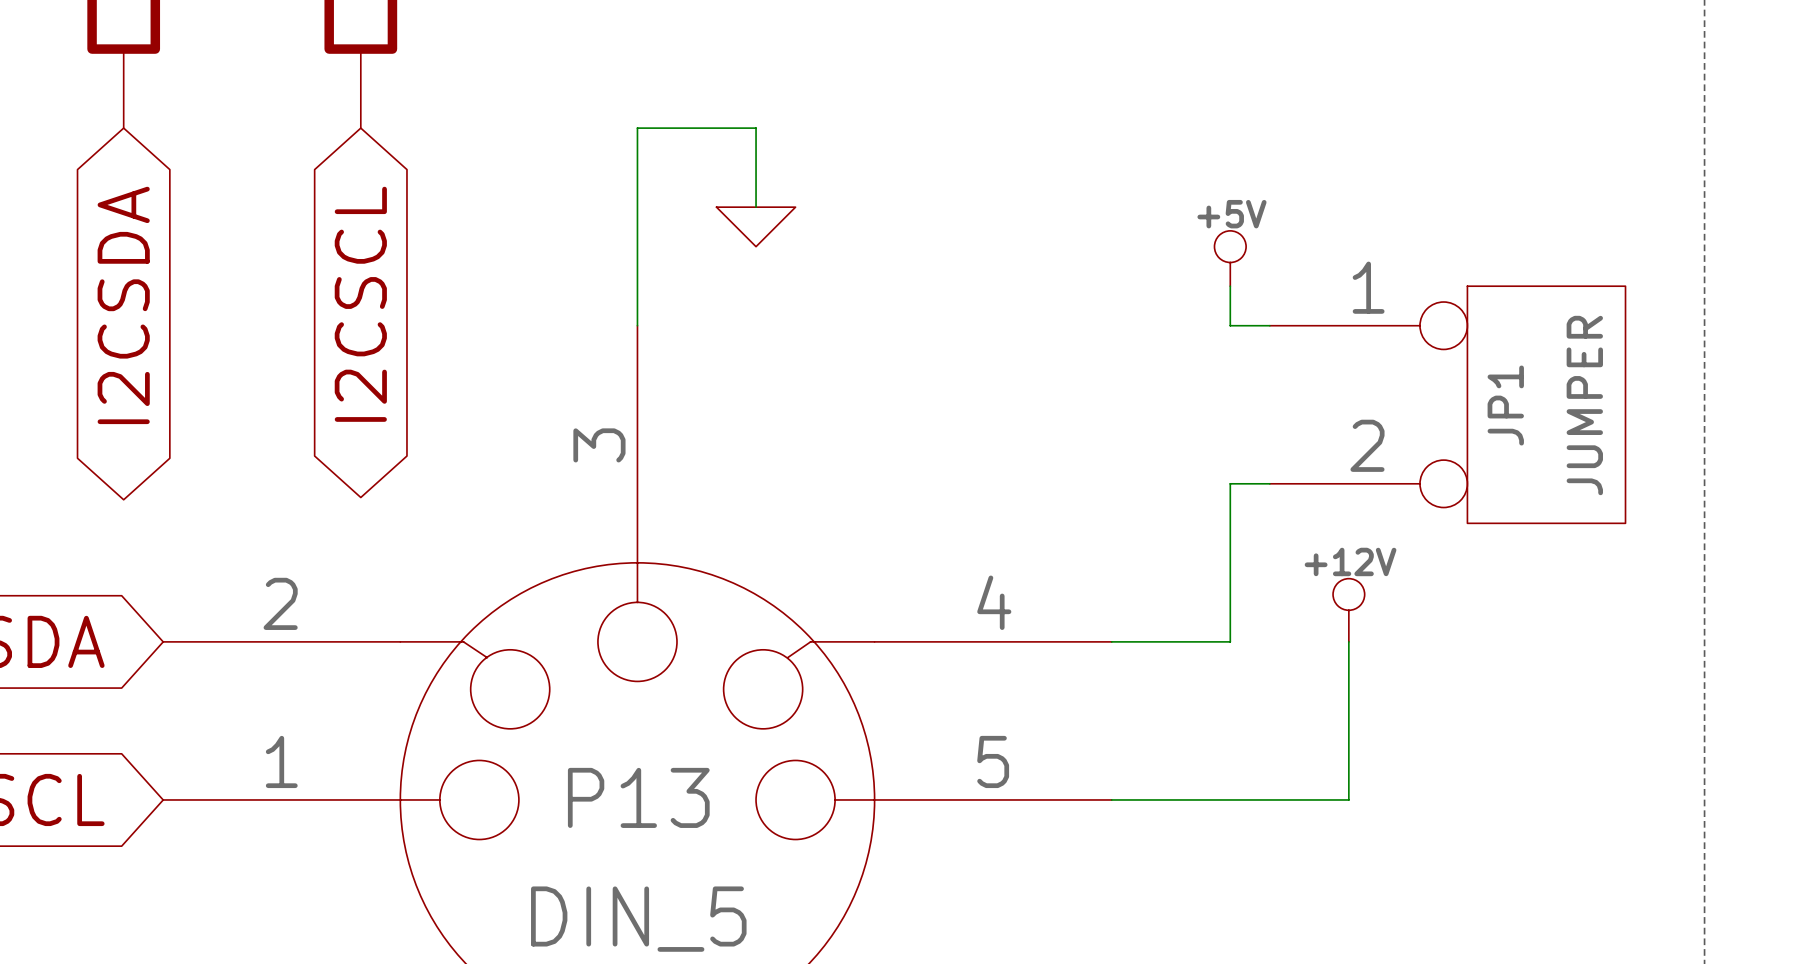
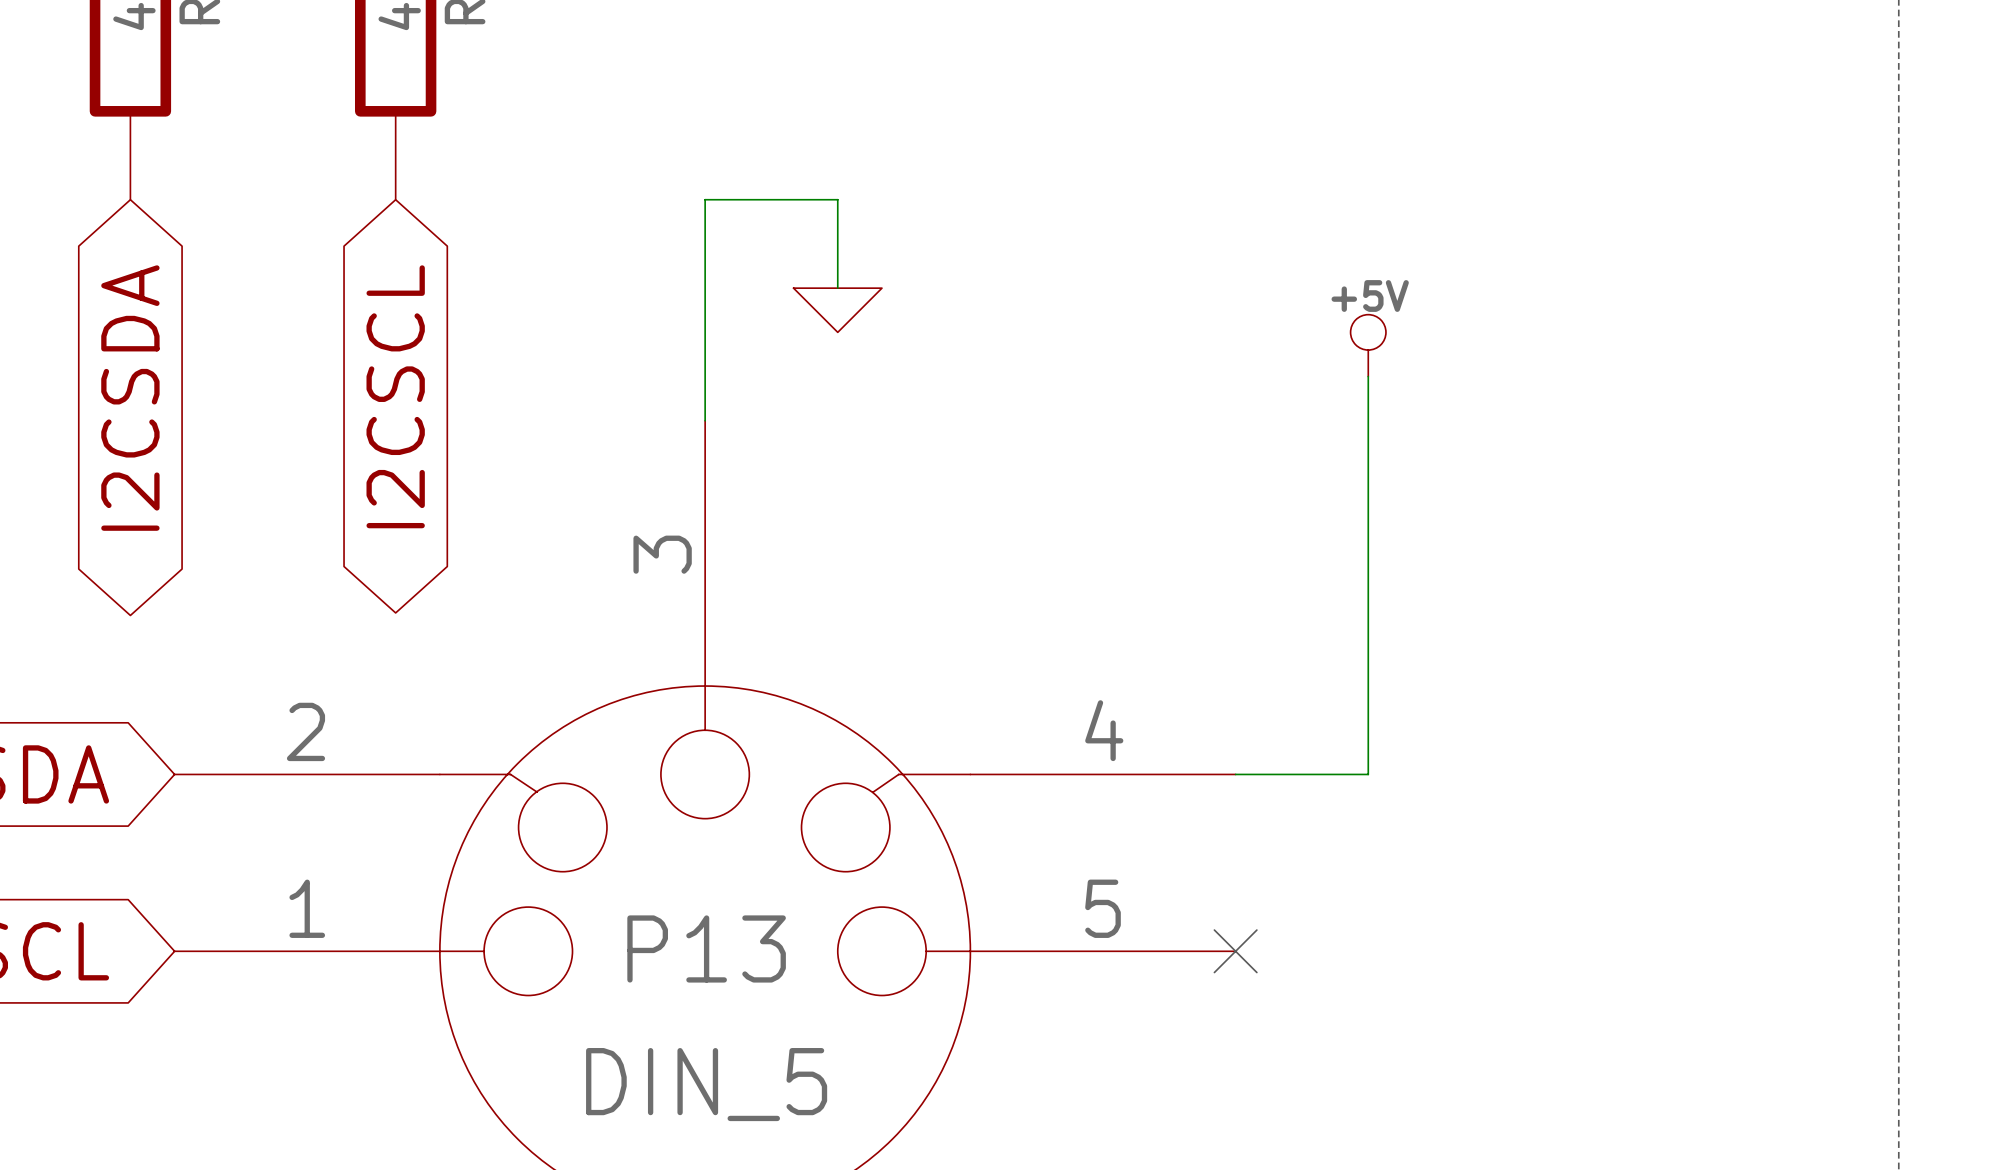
wire: (1230, 325) (1269, 325) -> (1368, 420) (1368, 597)
JP1: JUMPER (1447, 404) -> none
wire: (1230, 483) (1269, 483) -> none
power symbol: +12V (1348, 610) -> none
wire: (1348, 641) (1348, 799) (1111, 799) -> none
no-connect mark: none -> (1235, 951)

